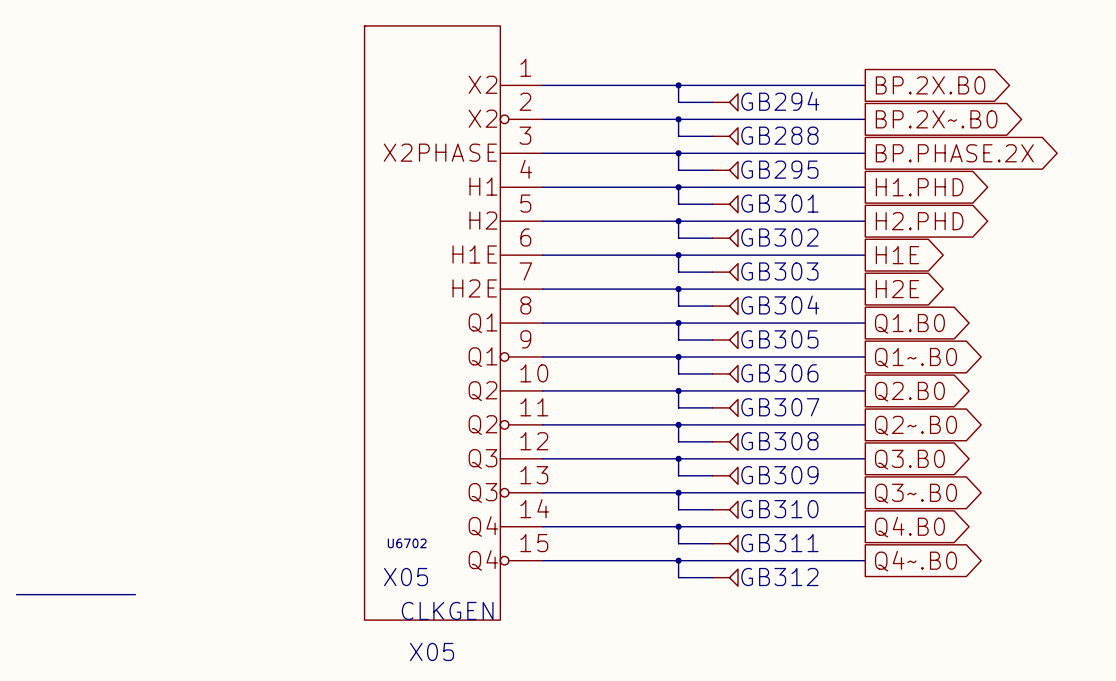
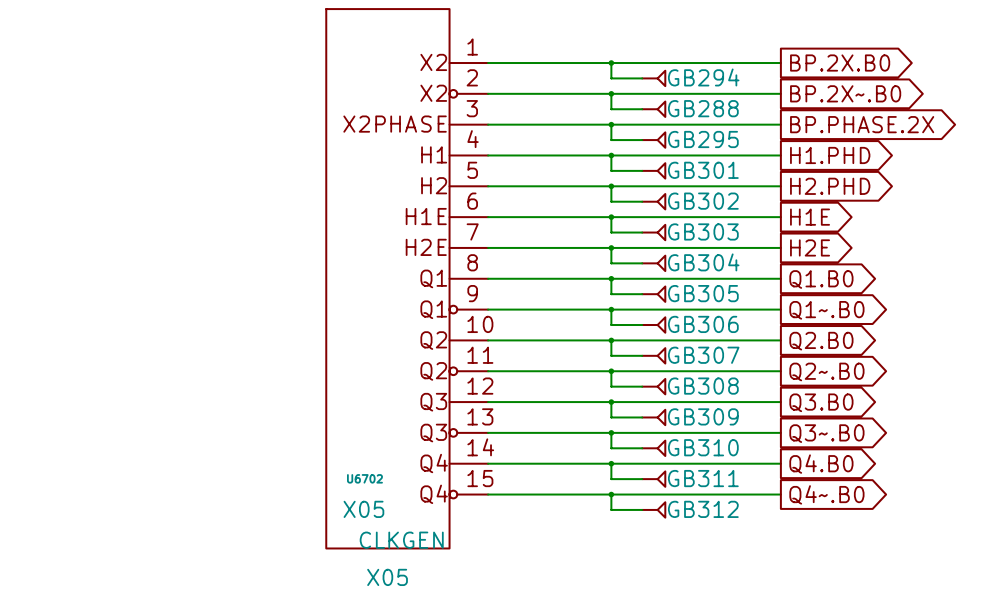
wire: (16, 594) (135, 594) -> none

